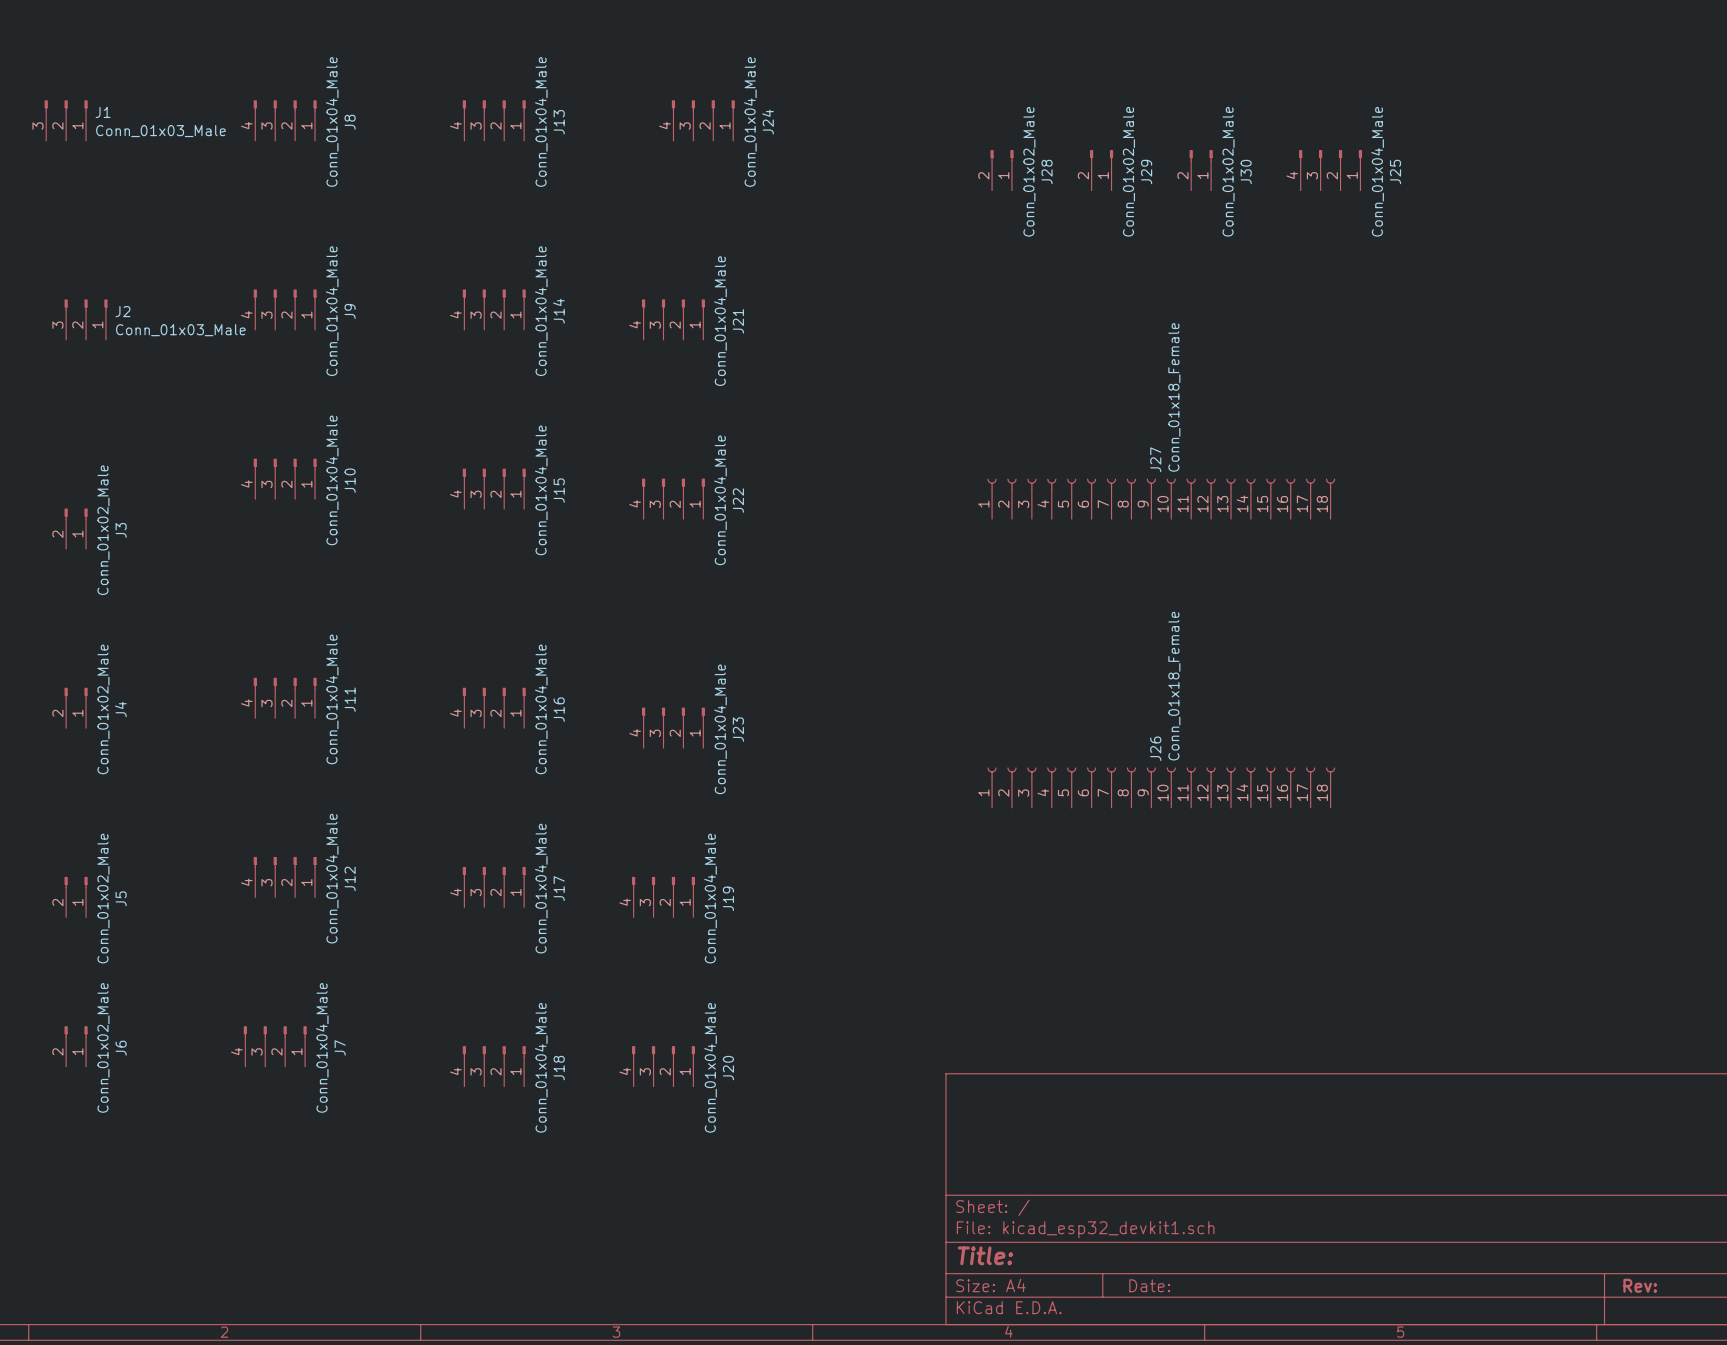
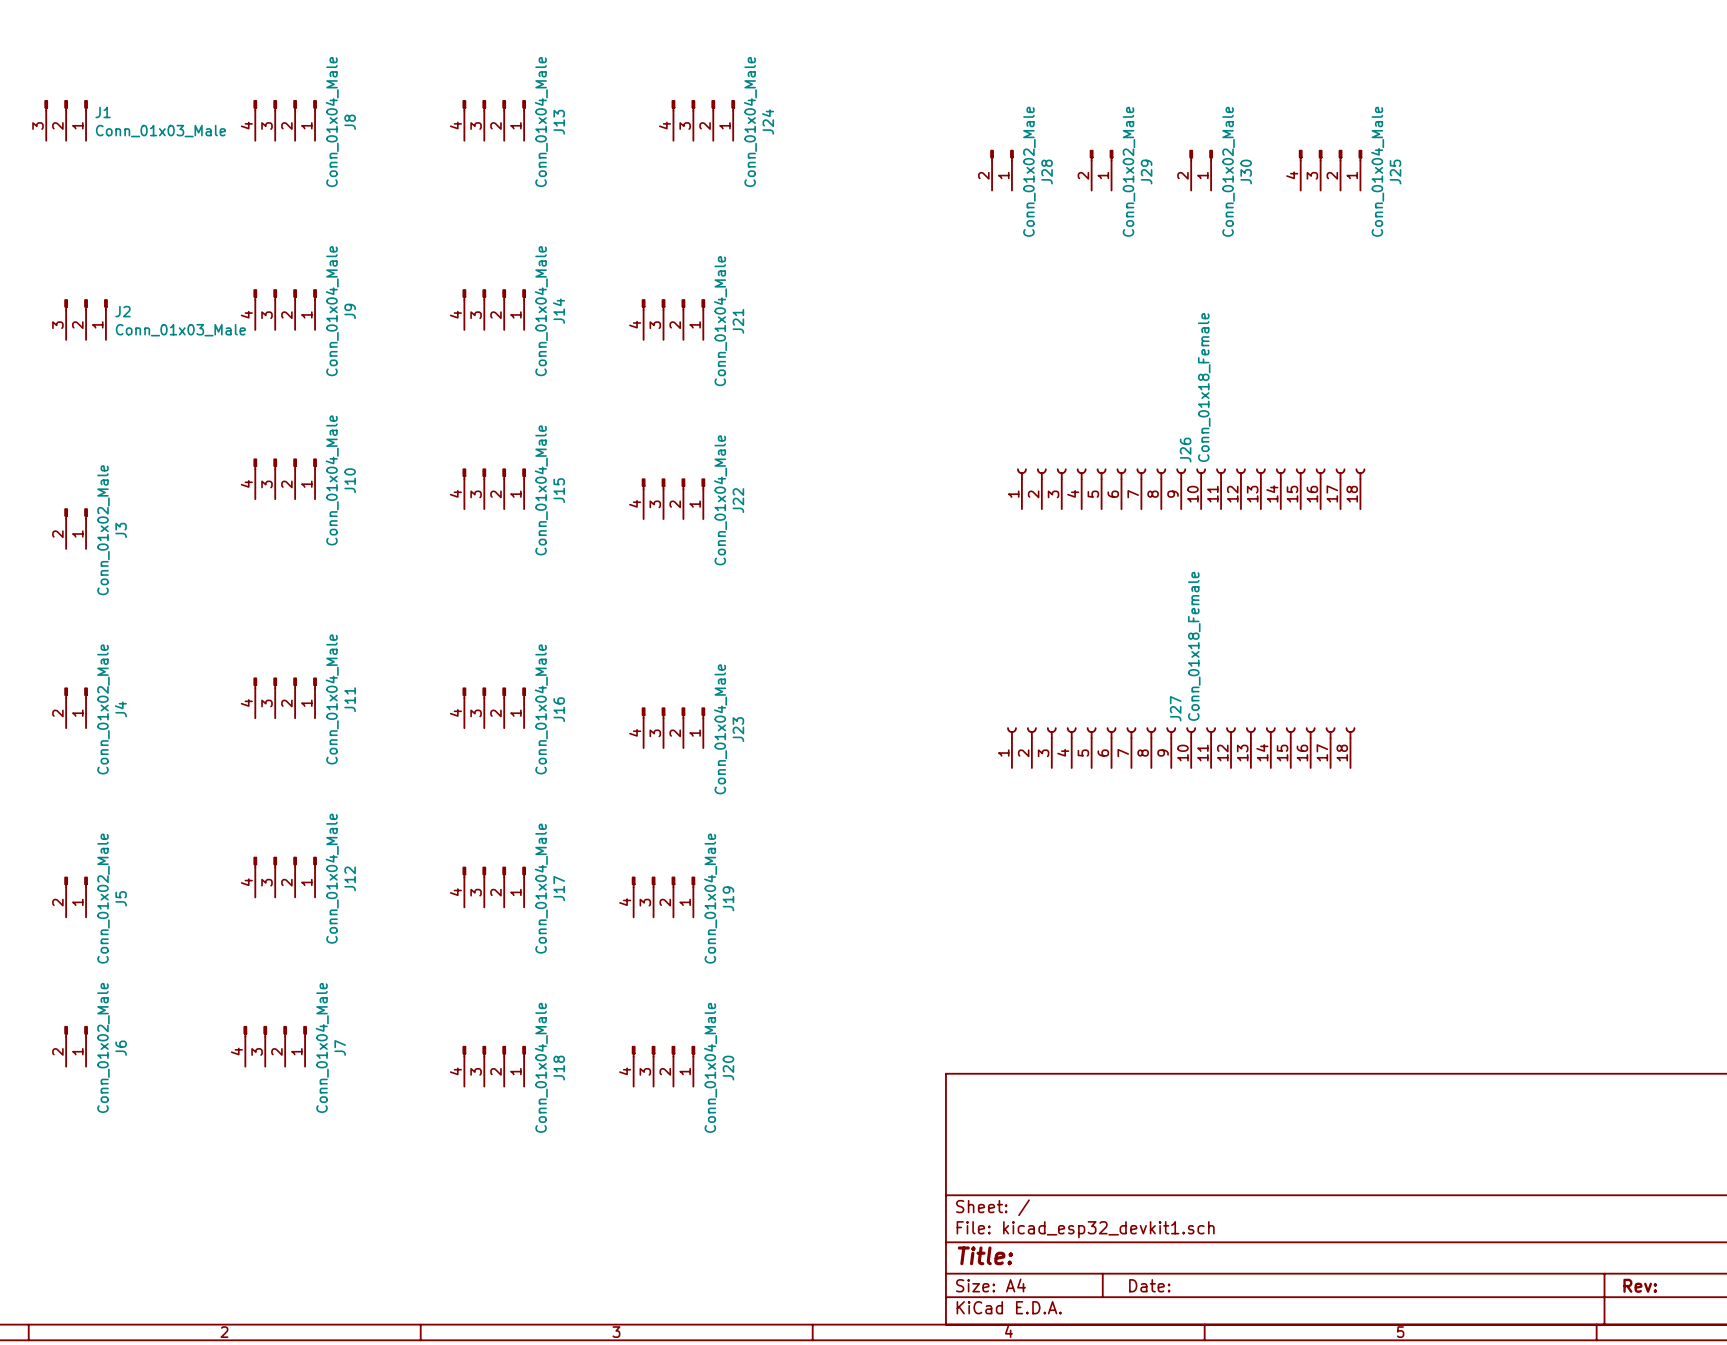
J27 position: (1161, 498) -> (1181, 747)
J26 position: (1161, 787) -> (1191, 488)

